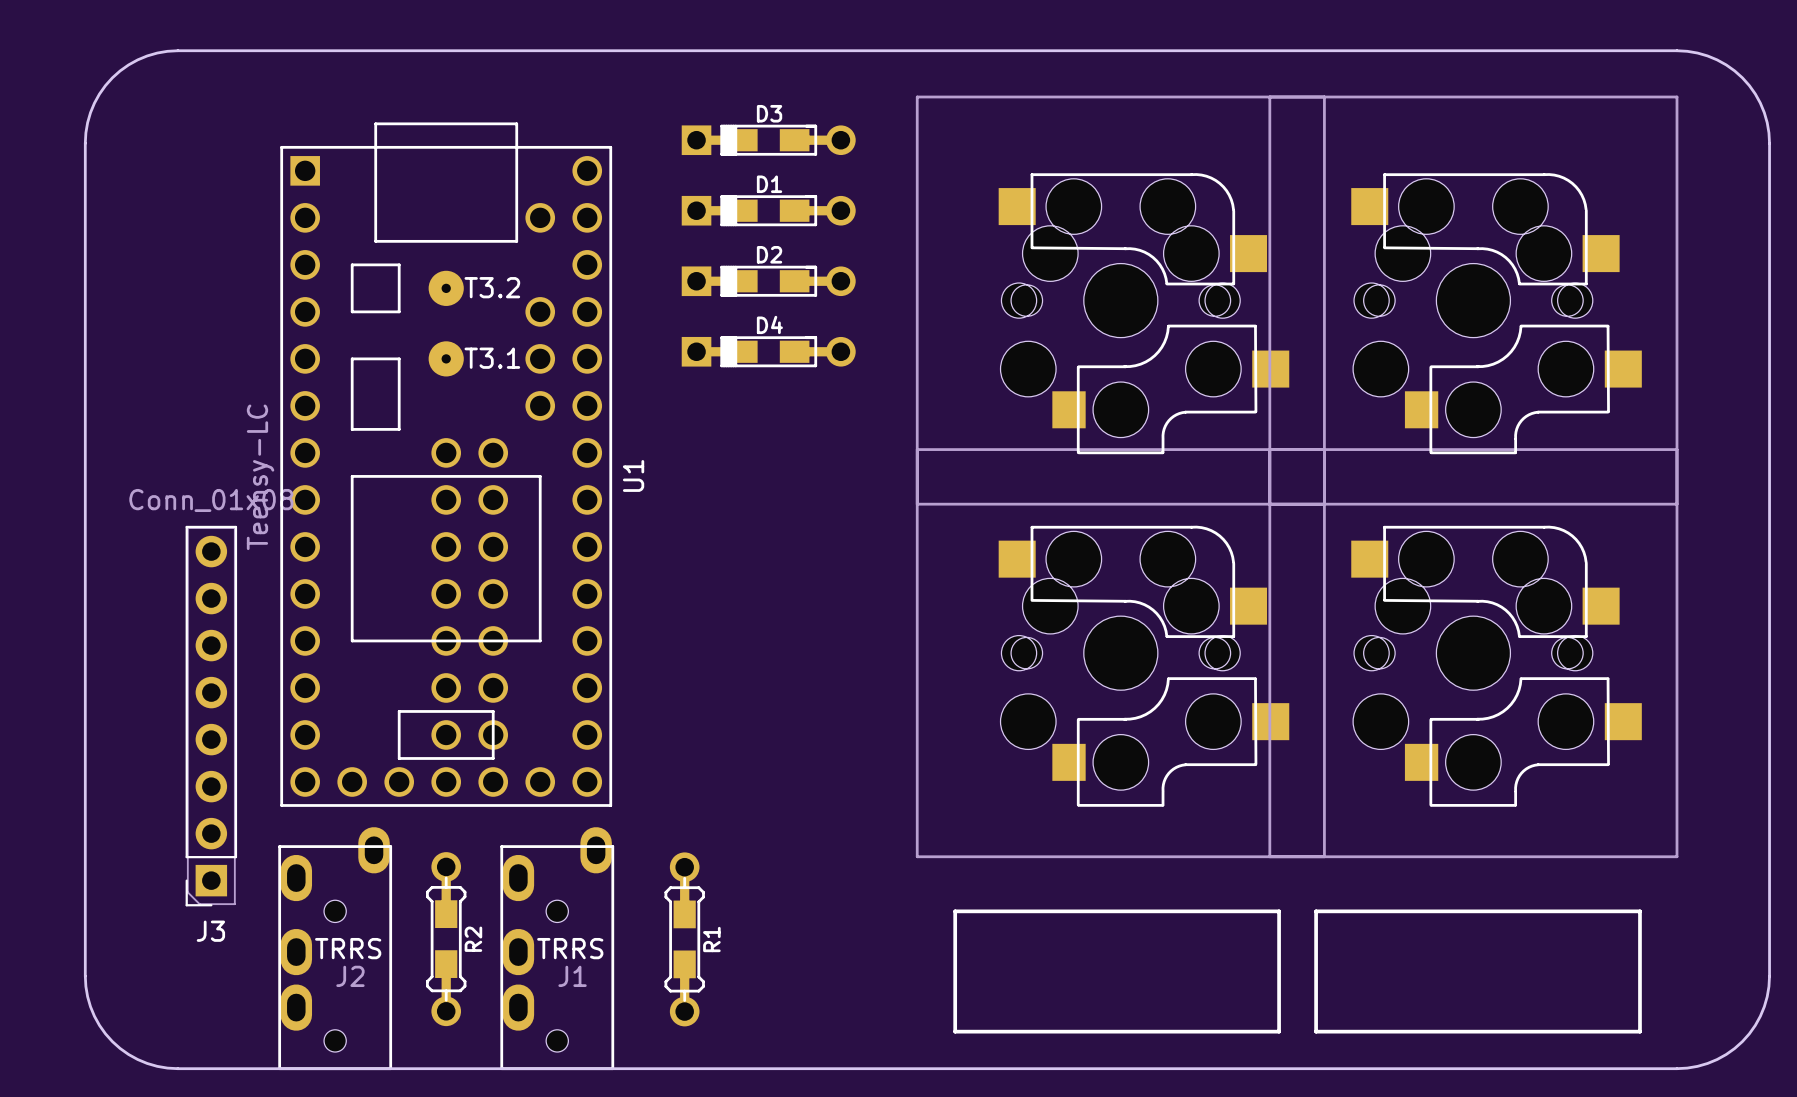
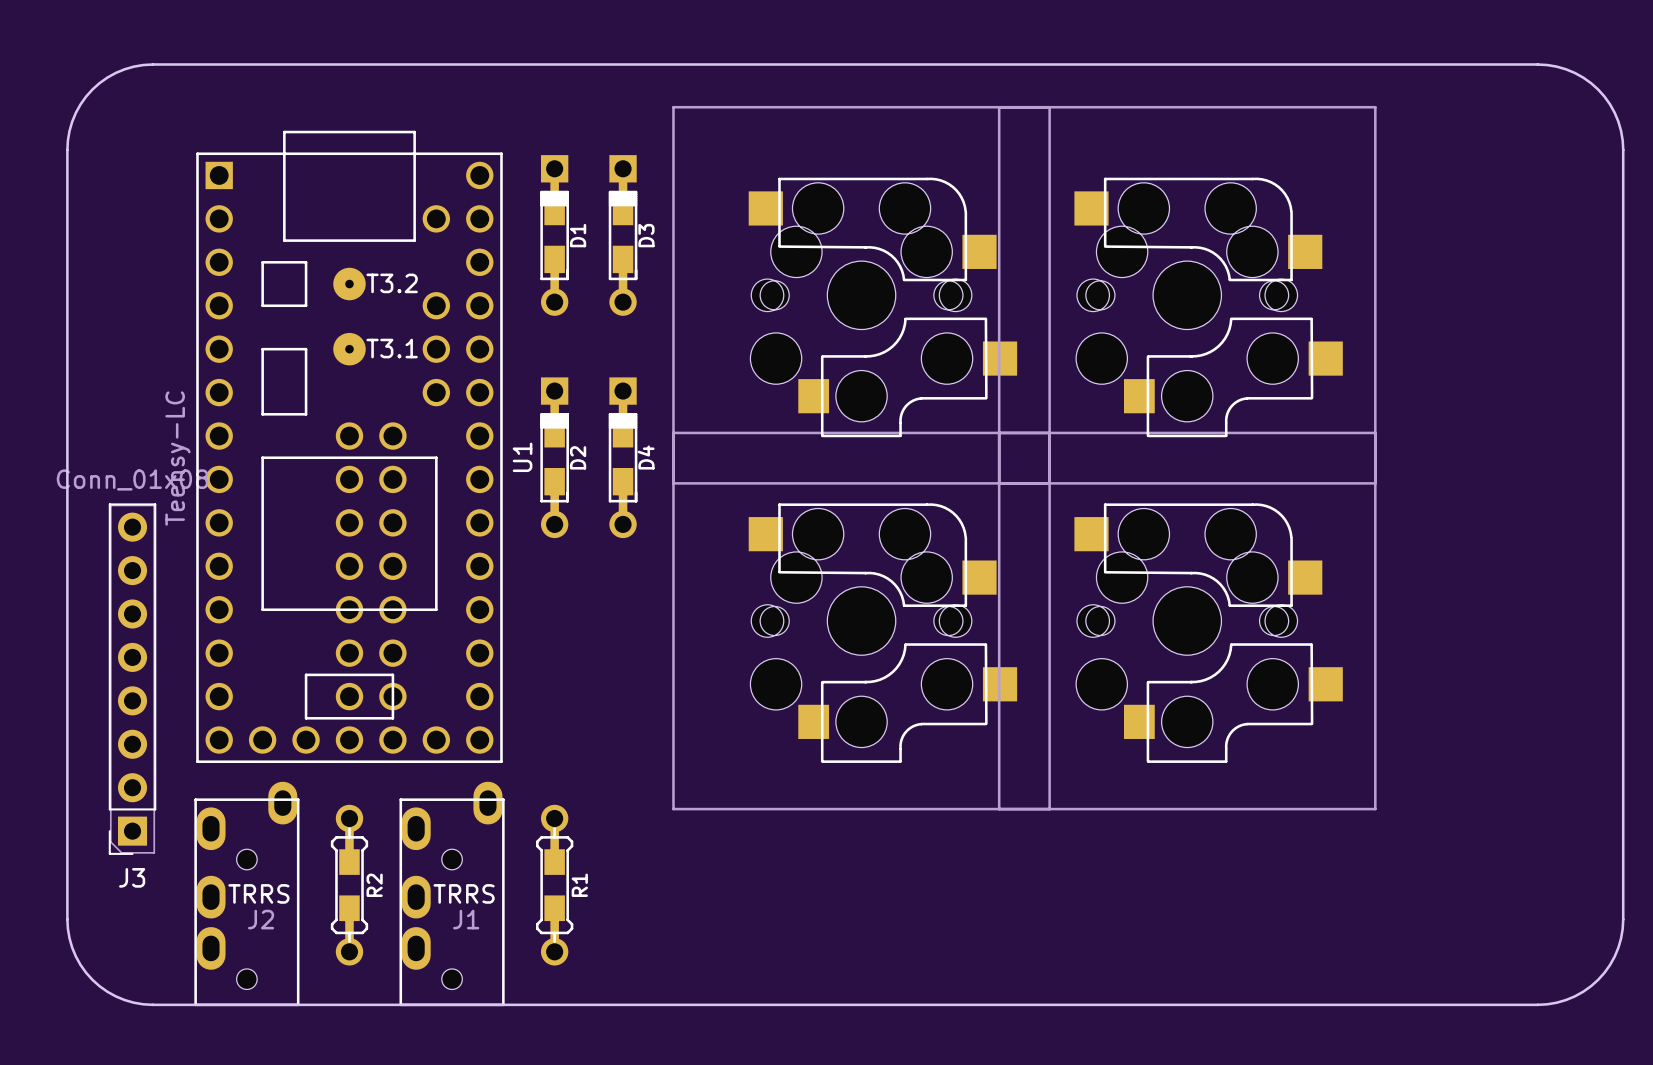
D3 rotation: 0° (768, 140) -> 90° clockwise (623, 235)
D3 position: (768, 140) -> (623, 235)
D1 rotation: 0° (768, 210) -> 90° clockwise (554, 235)
D1 position: (768, 210) -> (554, 235)
D2 rotation: 0° (768, 281) -> 90° clockwise (554, 457)
D2 position: (768, 281) -> (554, 457)
part: none -> (861, 295)
part: (1120, 300) -> none
part: none -> (1187, 295)
part: (1473, 300) -> none
D4 rotation: 0° (768, 351) -> 90° clockwise (623, 457)
D4 position: (768, 351) -> (623, 457)
U1 position: (446, 464) -> (349, 446)
part: none -> (861, 621)
part: (1120, 653) -> none
part: none -> (1187, 621)
part: (1473, 653) -> none
J3 position: (211, 716) -> (132, 679)
line: (955, 911) (955, 1031) (1279, 1031) (1279, 911) (955, 911) -> none
line: (1316, 911) (1639, 911) (1639, 1031) (1316, 1031) (1316, 911) -> none
R2 position: (446, 939) -> (349, 885)
R1 position: (684, 939) -> (554, 885)
J2 position: (335, 948) -> (246, 893)
J1 position: (557, 948) -> (452, 893)

